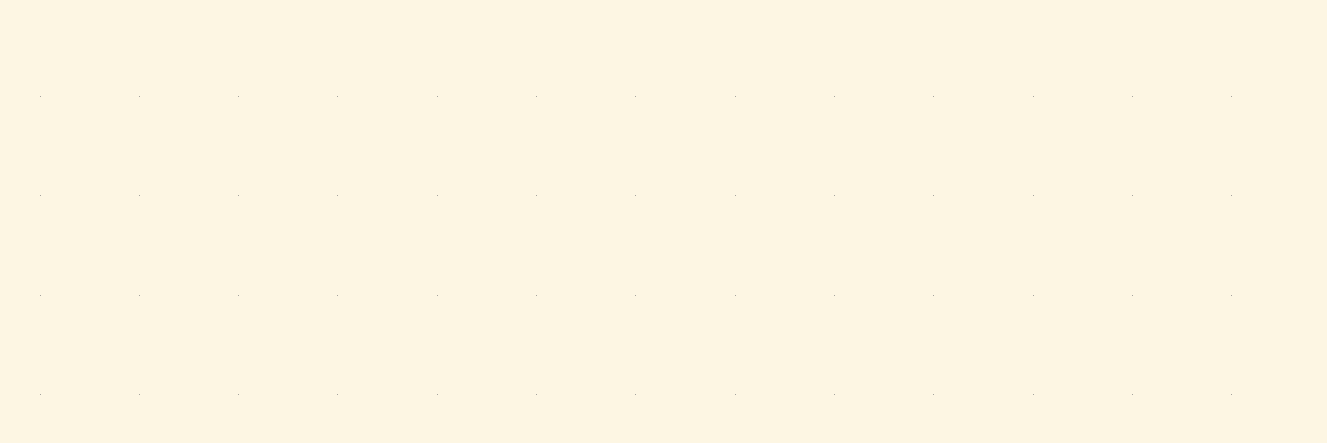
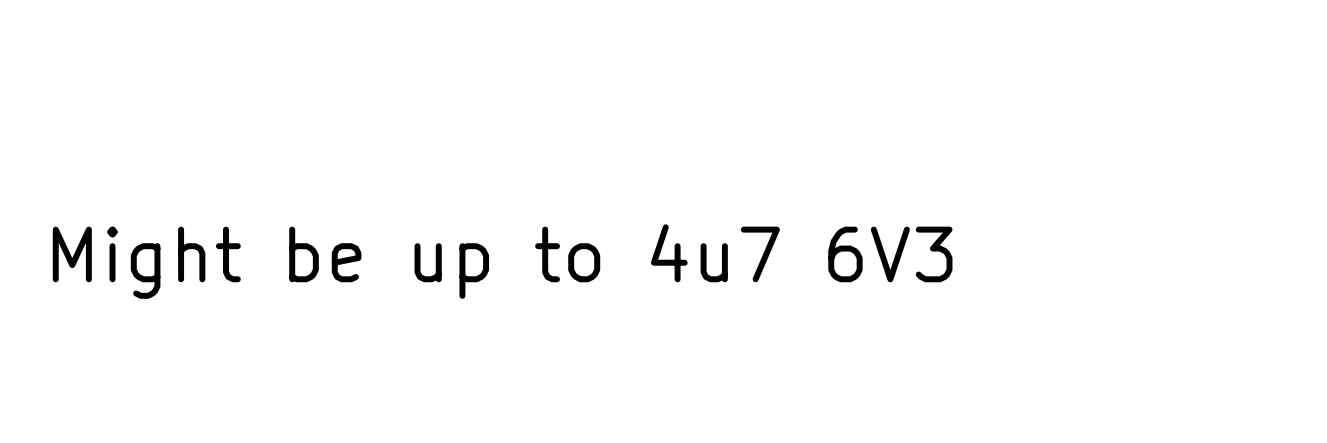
text: none -> Might be up to 4u7 6V3 (502, 261)

